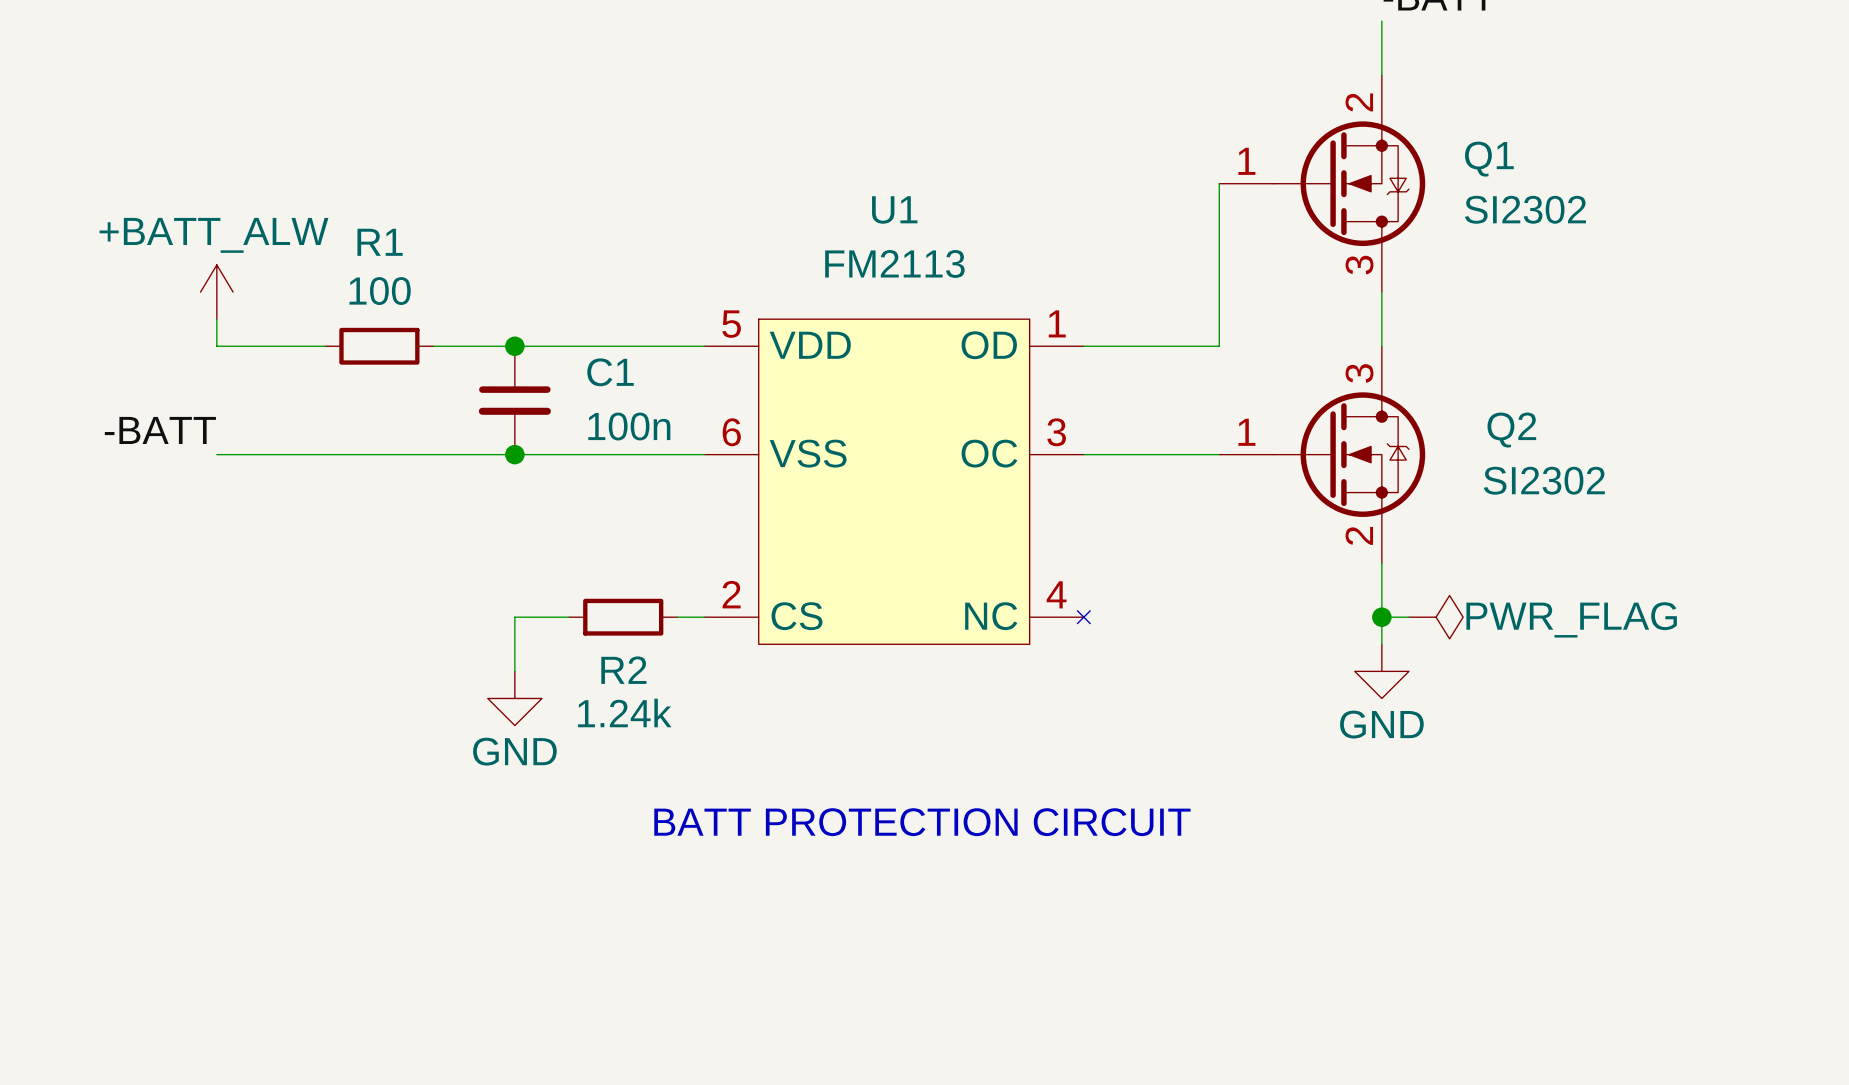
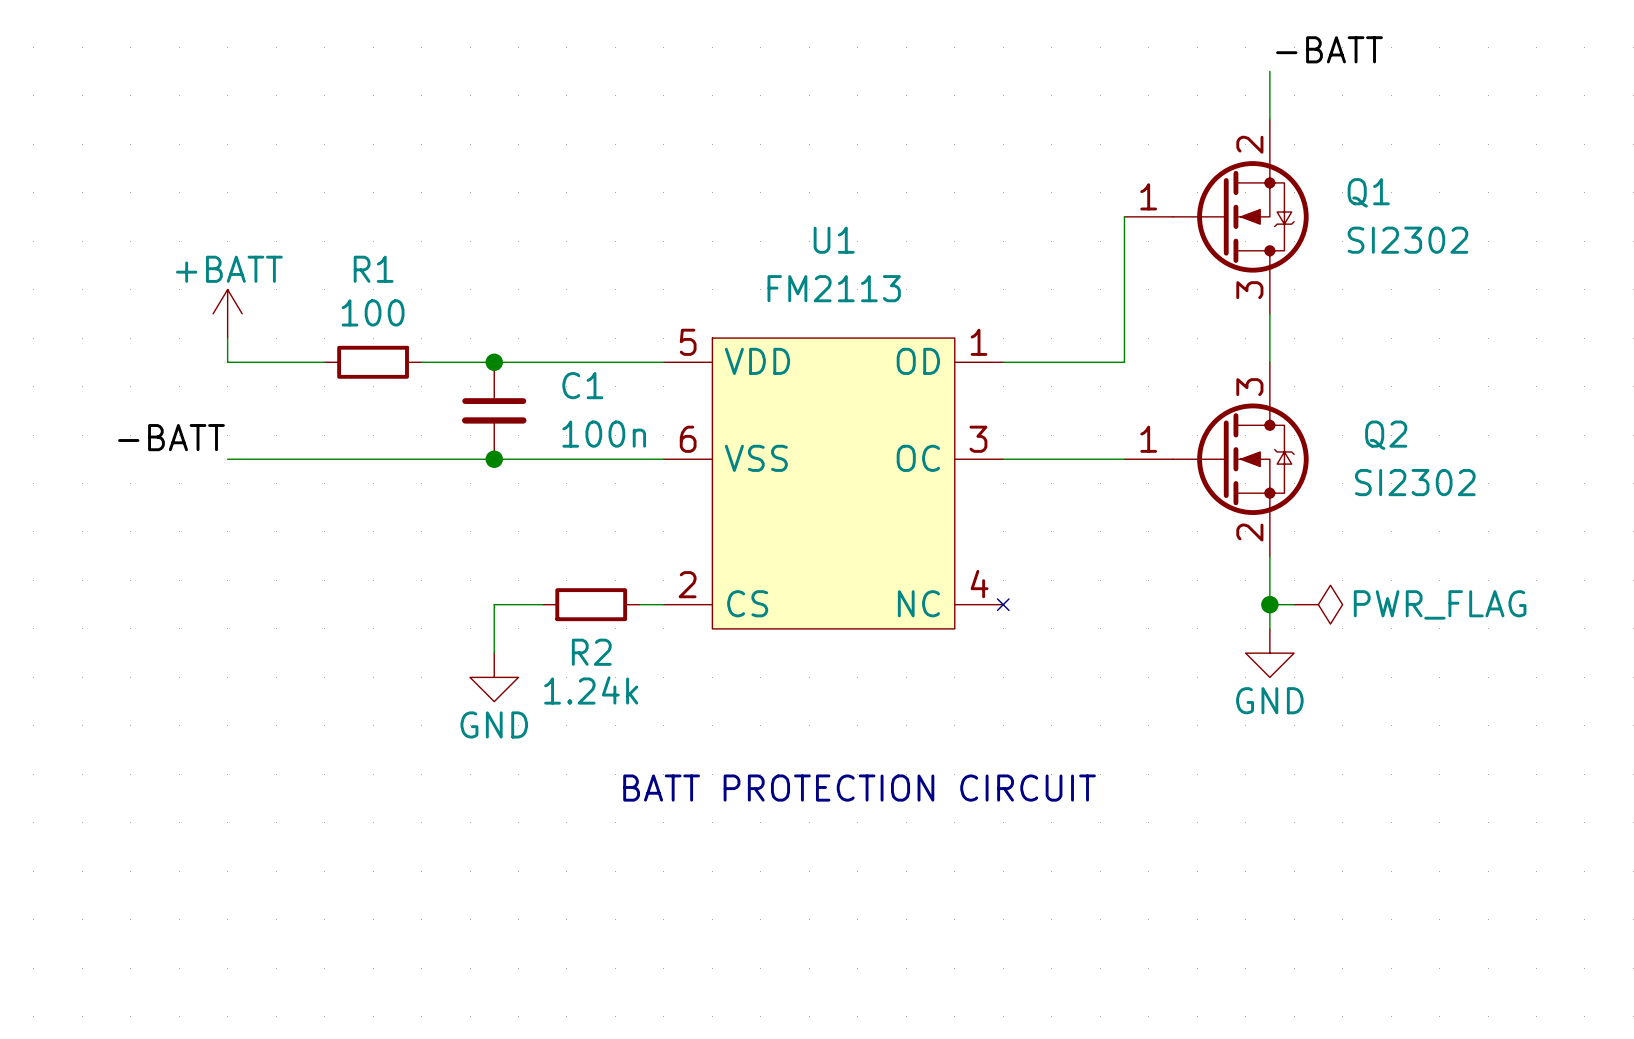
power symbol: +BATT_ALW (216, 292) -> +BATT (227, 313)

